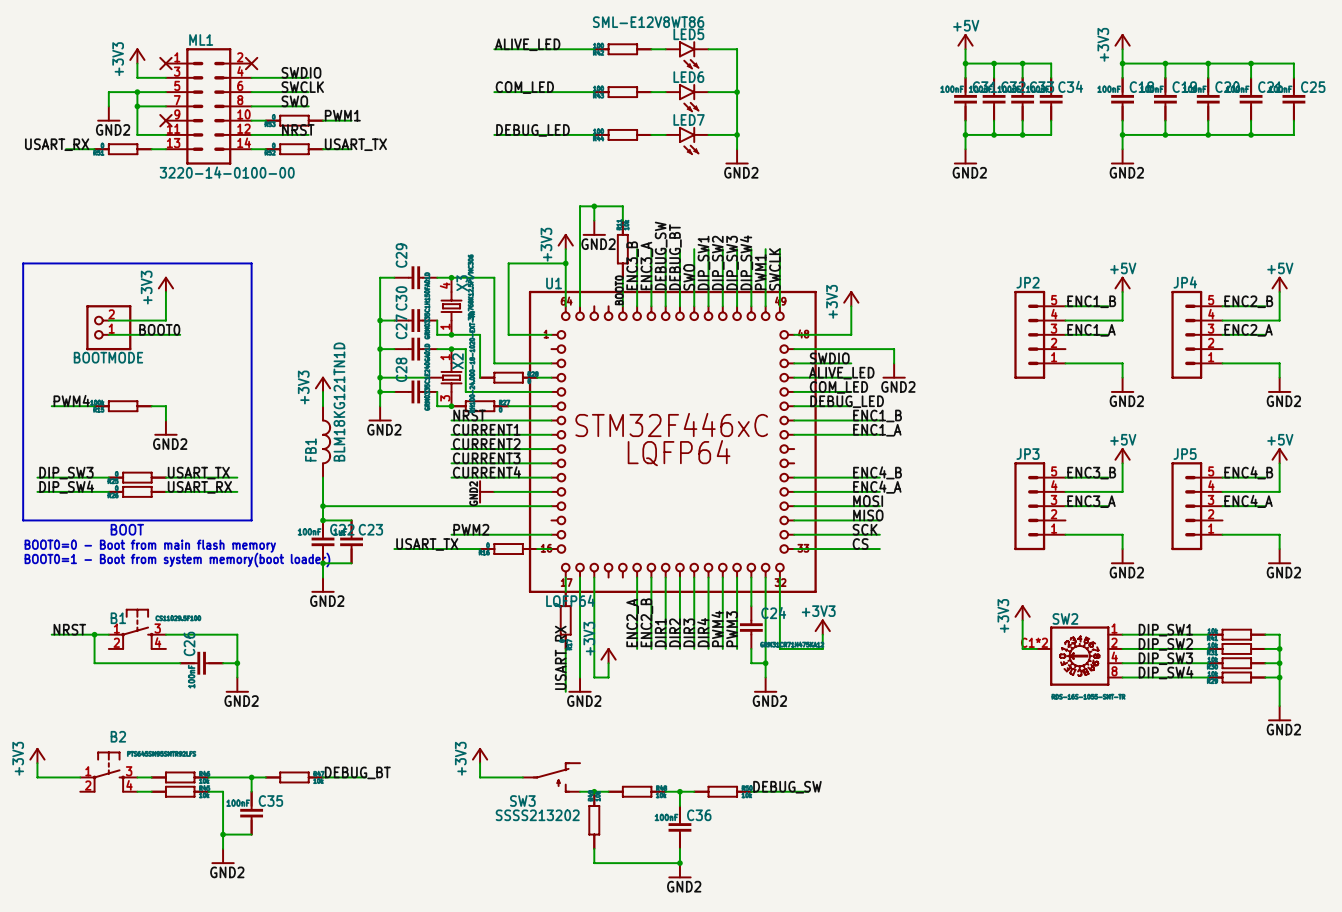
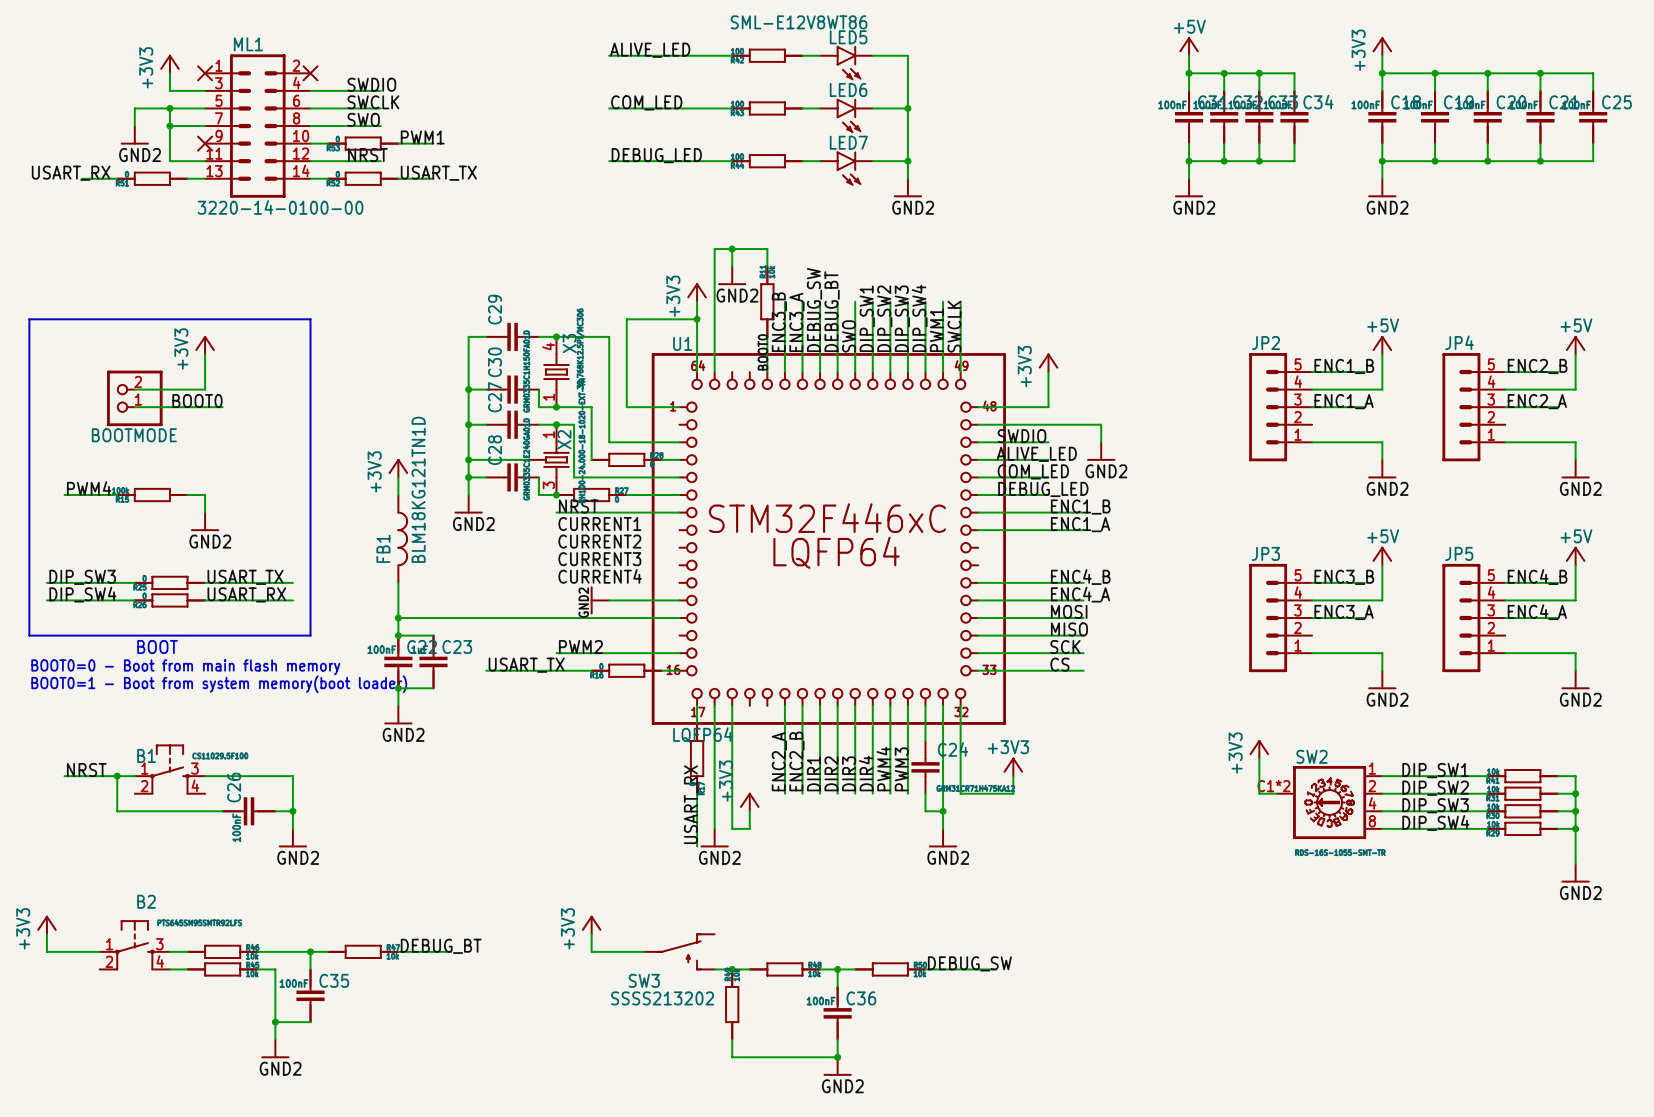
wire: (451, 434) (551, 434) -> none
wire: (451, 449) (551, 449) -> none
wire: (451, 463) (551, 463) -> none
wire: (451, 477) (551, 477) -> none

